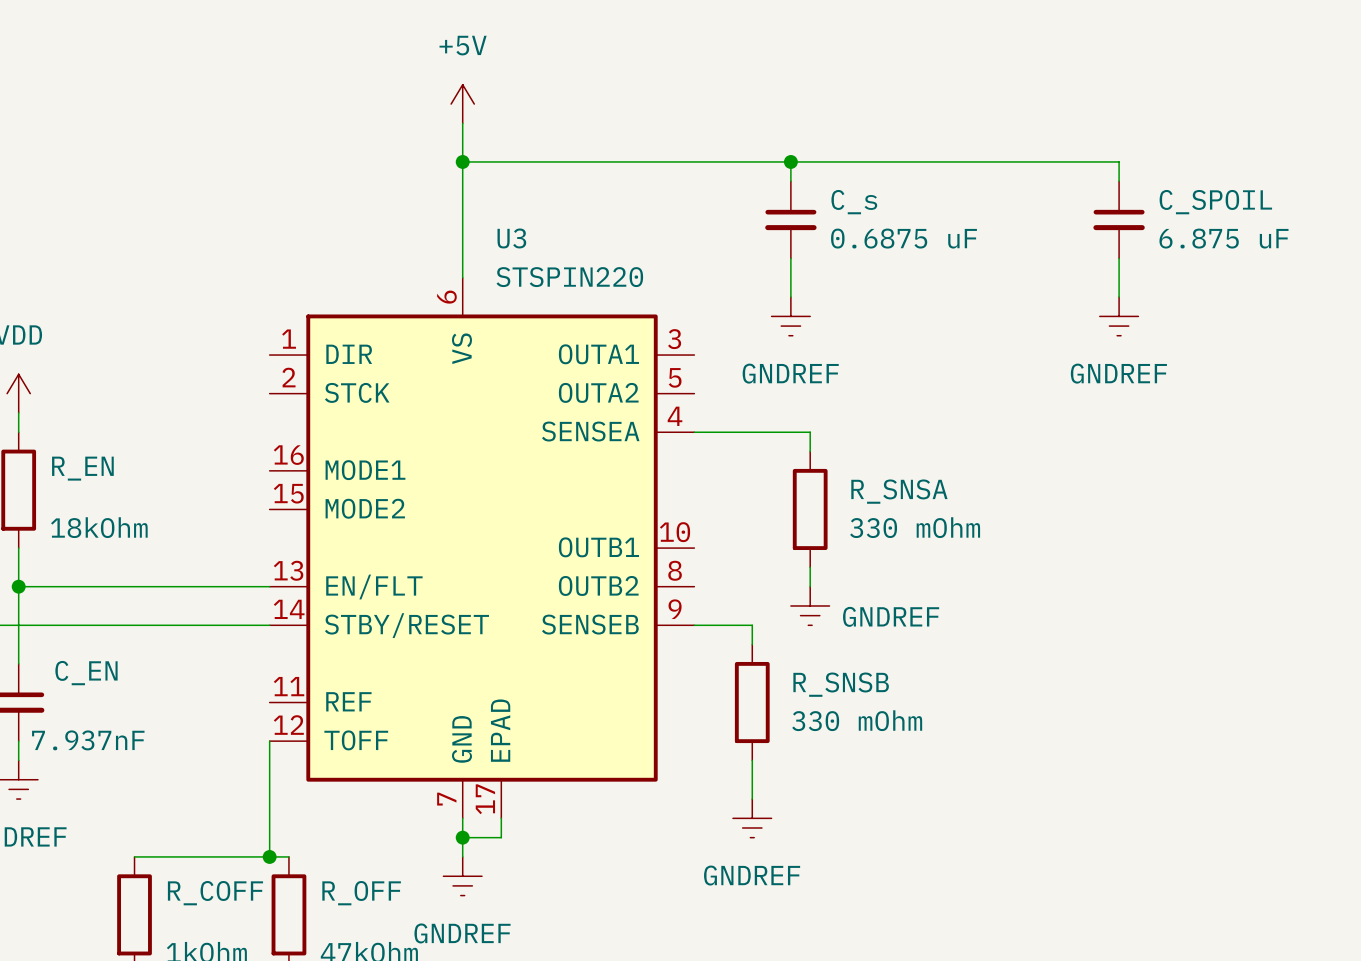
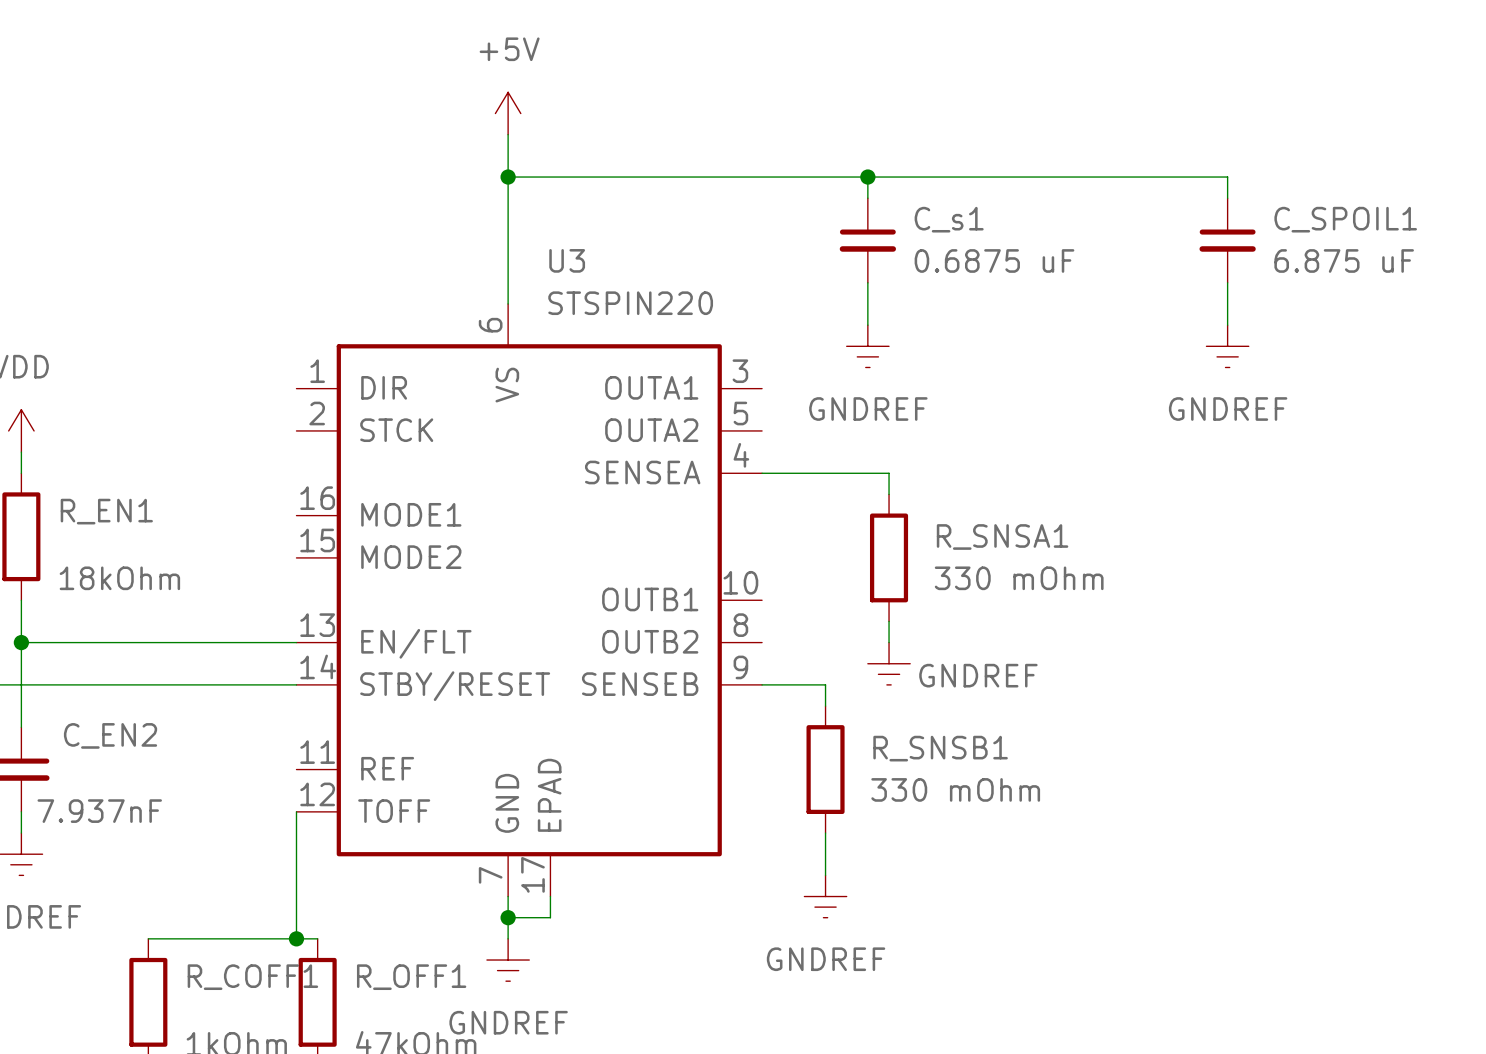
C_s name: C_s (854, 202) -> C_s1 (949, 219)
C_SPOIL name: C_SPOIL (1215, 202) -> C_SPOIL1 (1345, 219)
R_EN name: R_EN (82, 468) -> R_EN1 (106, 511)
R_SNSA name: R_SNSA (899, 491) -> R_SNSA1 (1002, 536)
C_EN name: C_EN (86, 673) -> C_EN2 (110, 735)
R_SNSB name: R_SNSB (841, 684) -> R_SNSB1 (940, 748)
R_COFF name: R_COFF (215, 893) -> R_COFF1 (252, 977)
R_OFF name: R_OFF (361, 893) -> R_OFF1 (411, 977)

